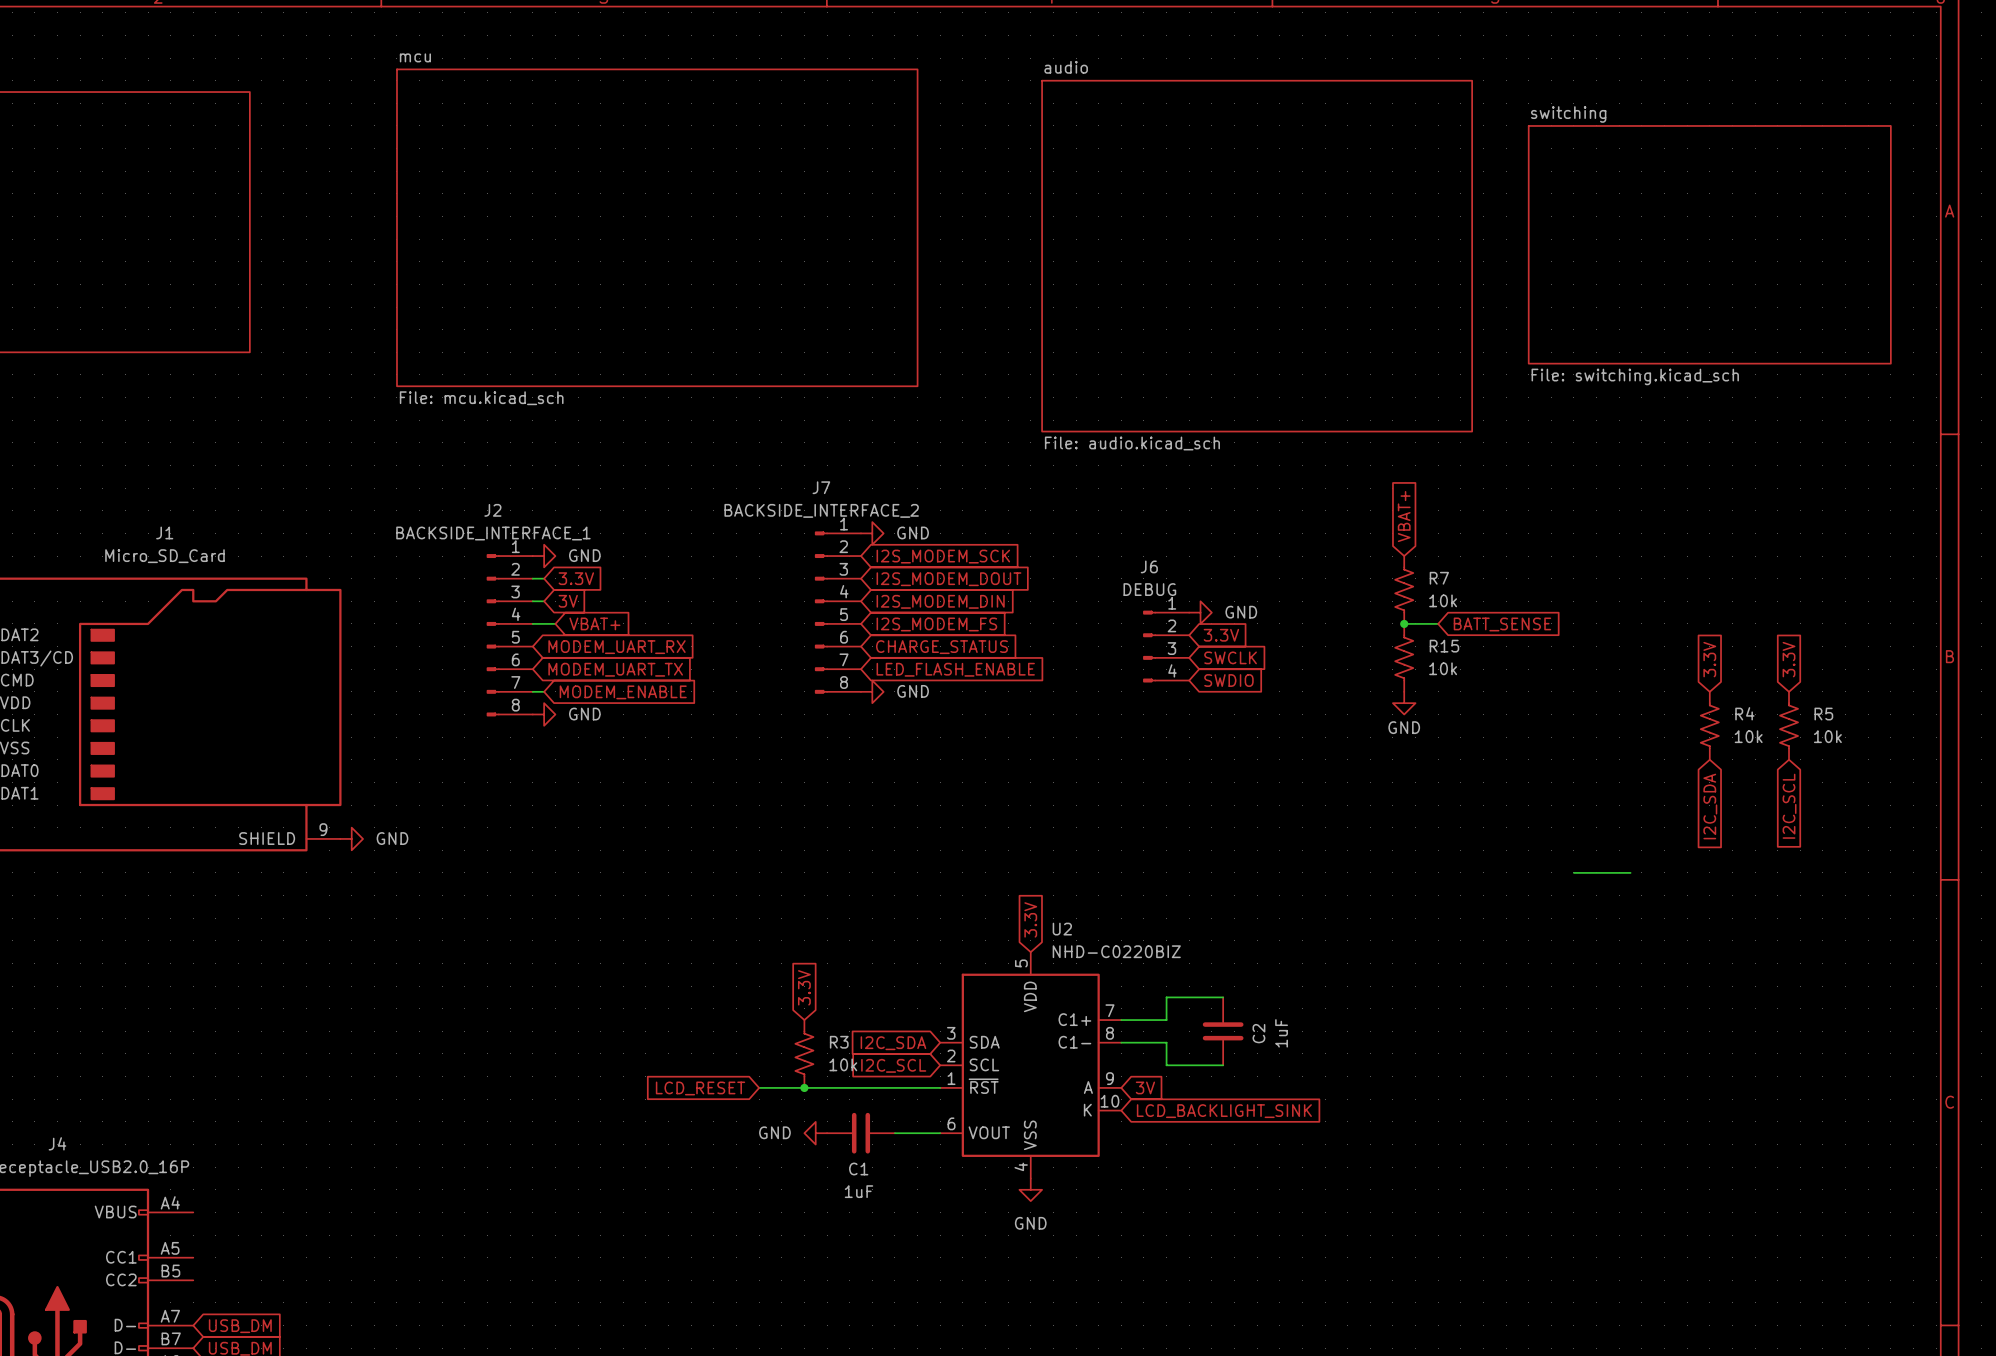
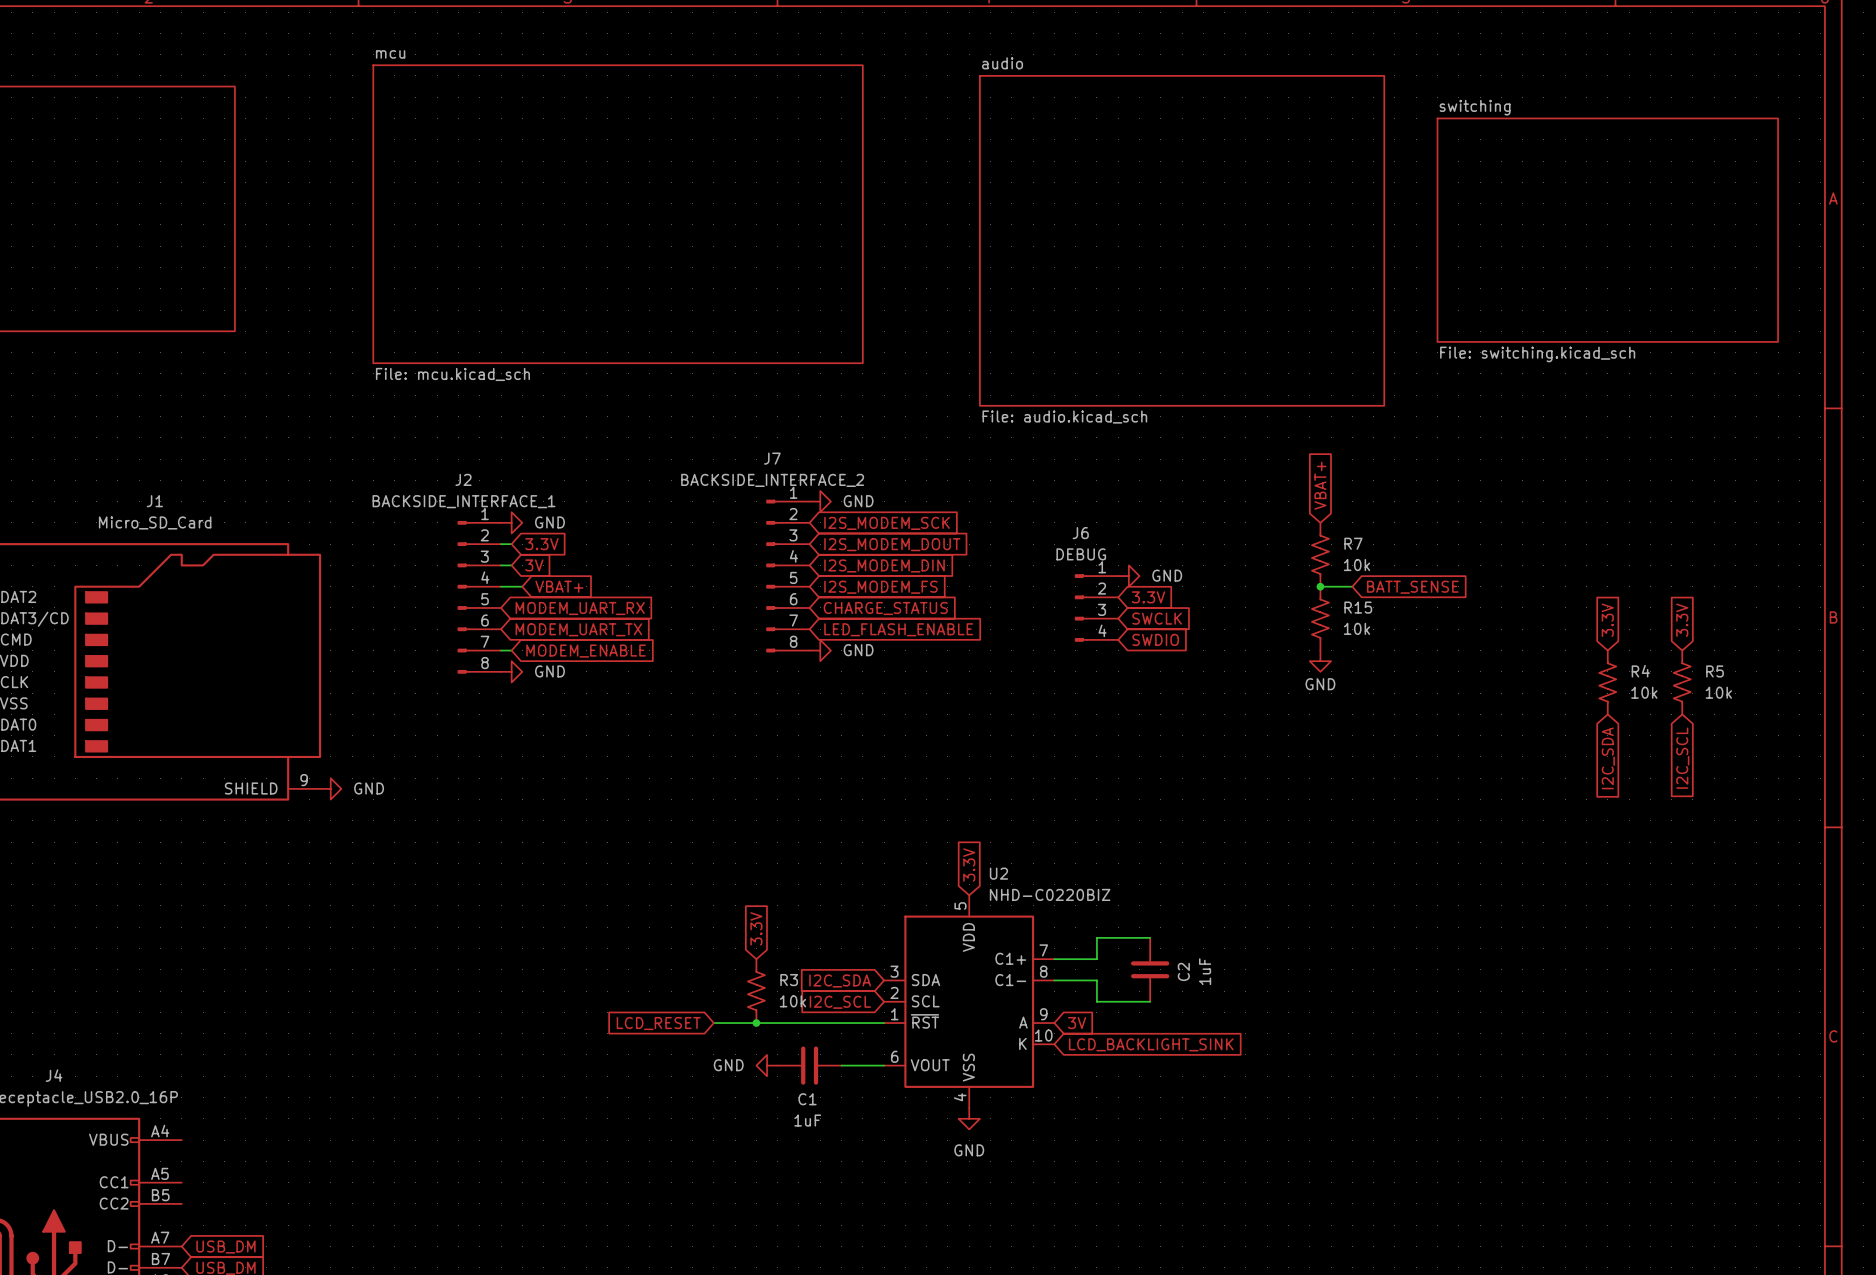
wire: (1573, 872) (1630, 872) -> none

